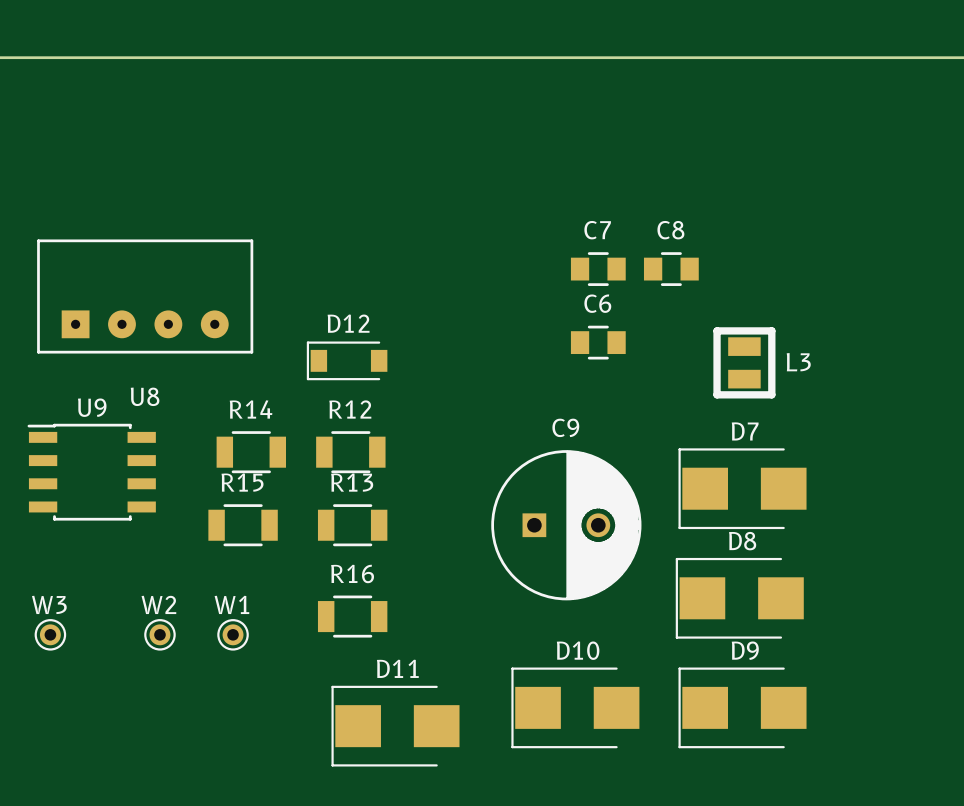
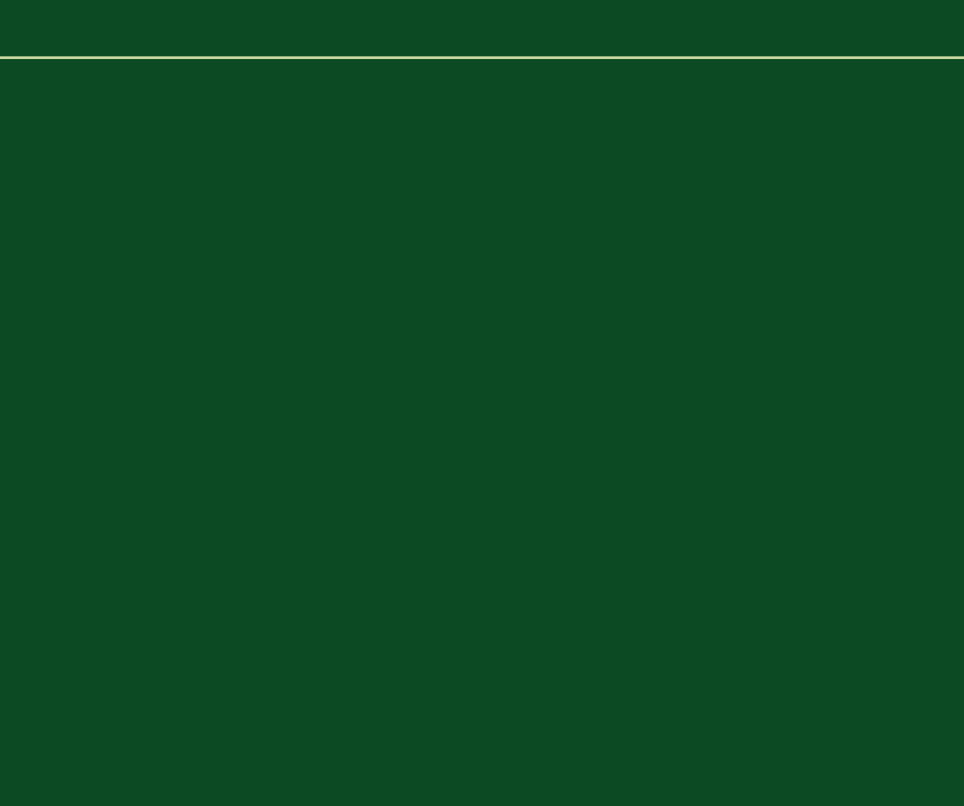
C7: (598, 269) -> none
C8: (671, 269) -> none
U8: (145, 296) -> none
C6: (598, 342) -> none
D12: (347, 360) -> none
L3: (744, 362) -> none
R14: (251, 452) -> none
R12: (350, 452) -> none
U9: (91, 472) -> none
D7: (742, 488) -> none
R15: (243, 525) -> none
R13: (352, 525) -> none
C9: (566, 525) -> none
D8: (739, 598) -> none
R16: (352, 616) -> none
W3: (50, 634) -> none
W2: (159, 634) -> none
W1: (233, 634) -> none
D10: (575, 707) -> none
D9: (742, 707) -> none
D11: (395, 726) -> none

